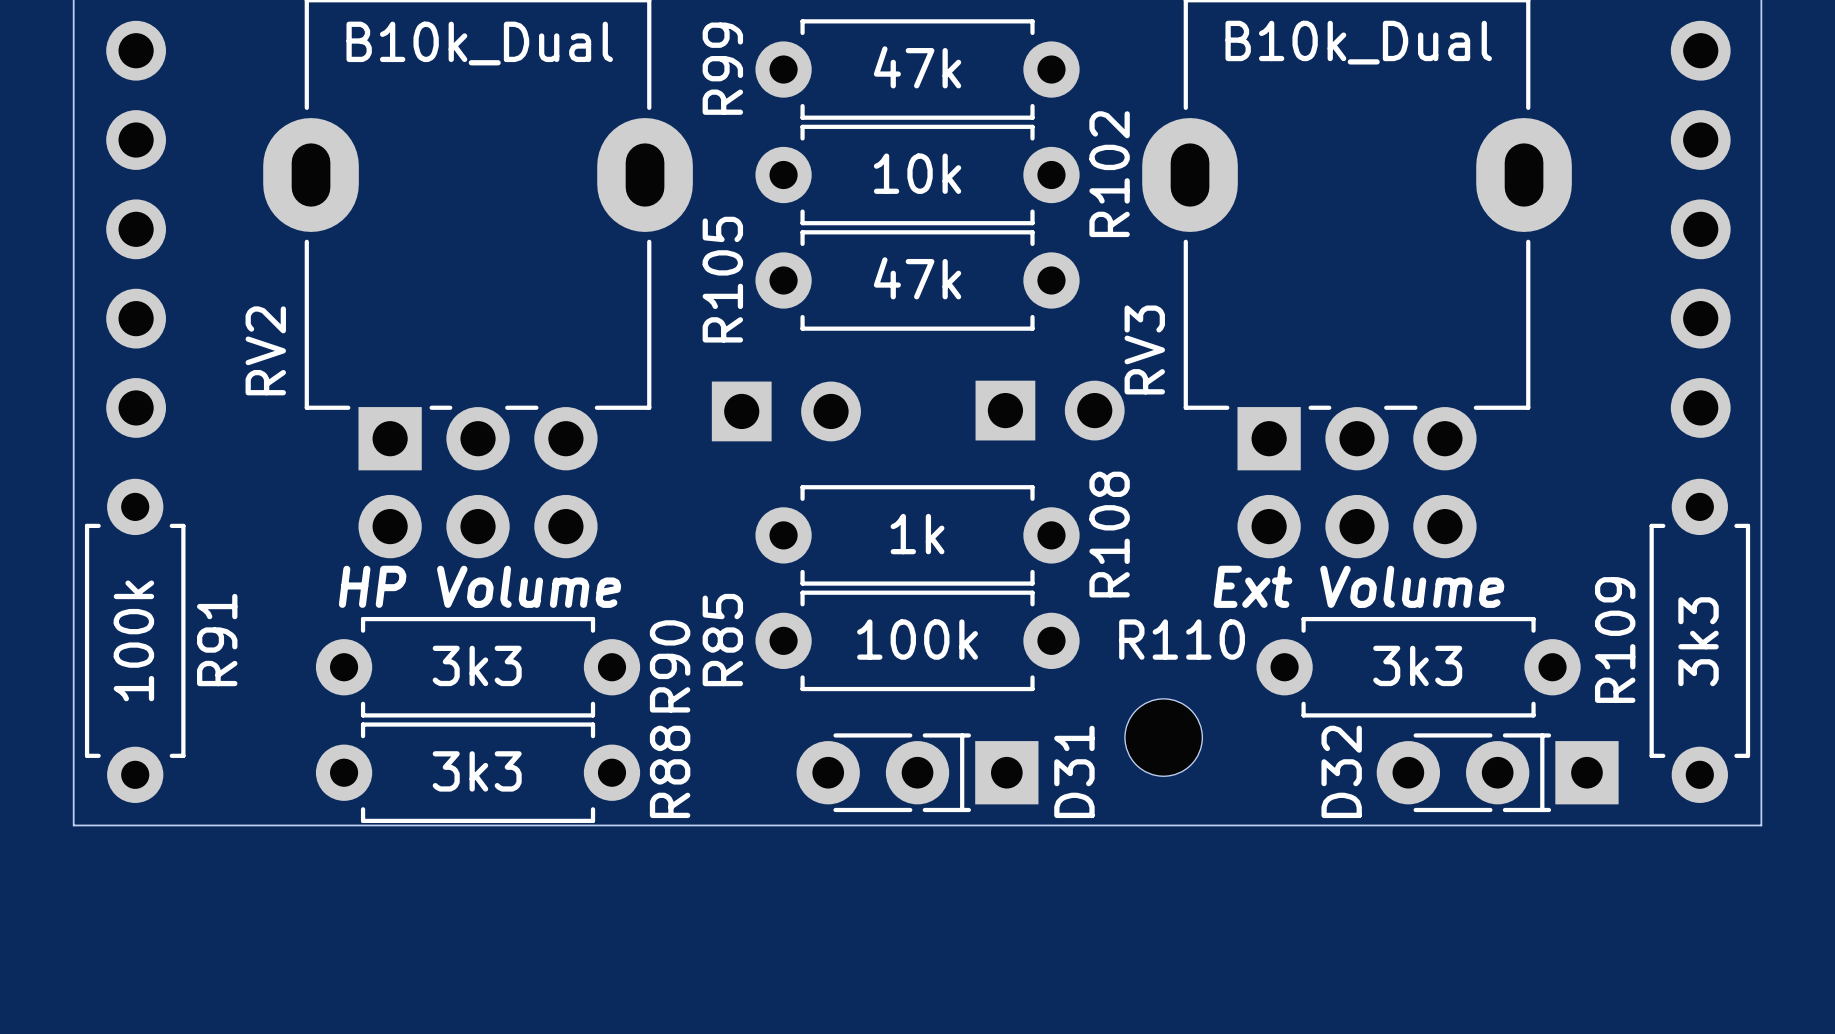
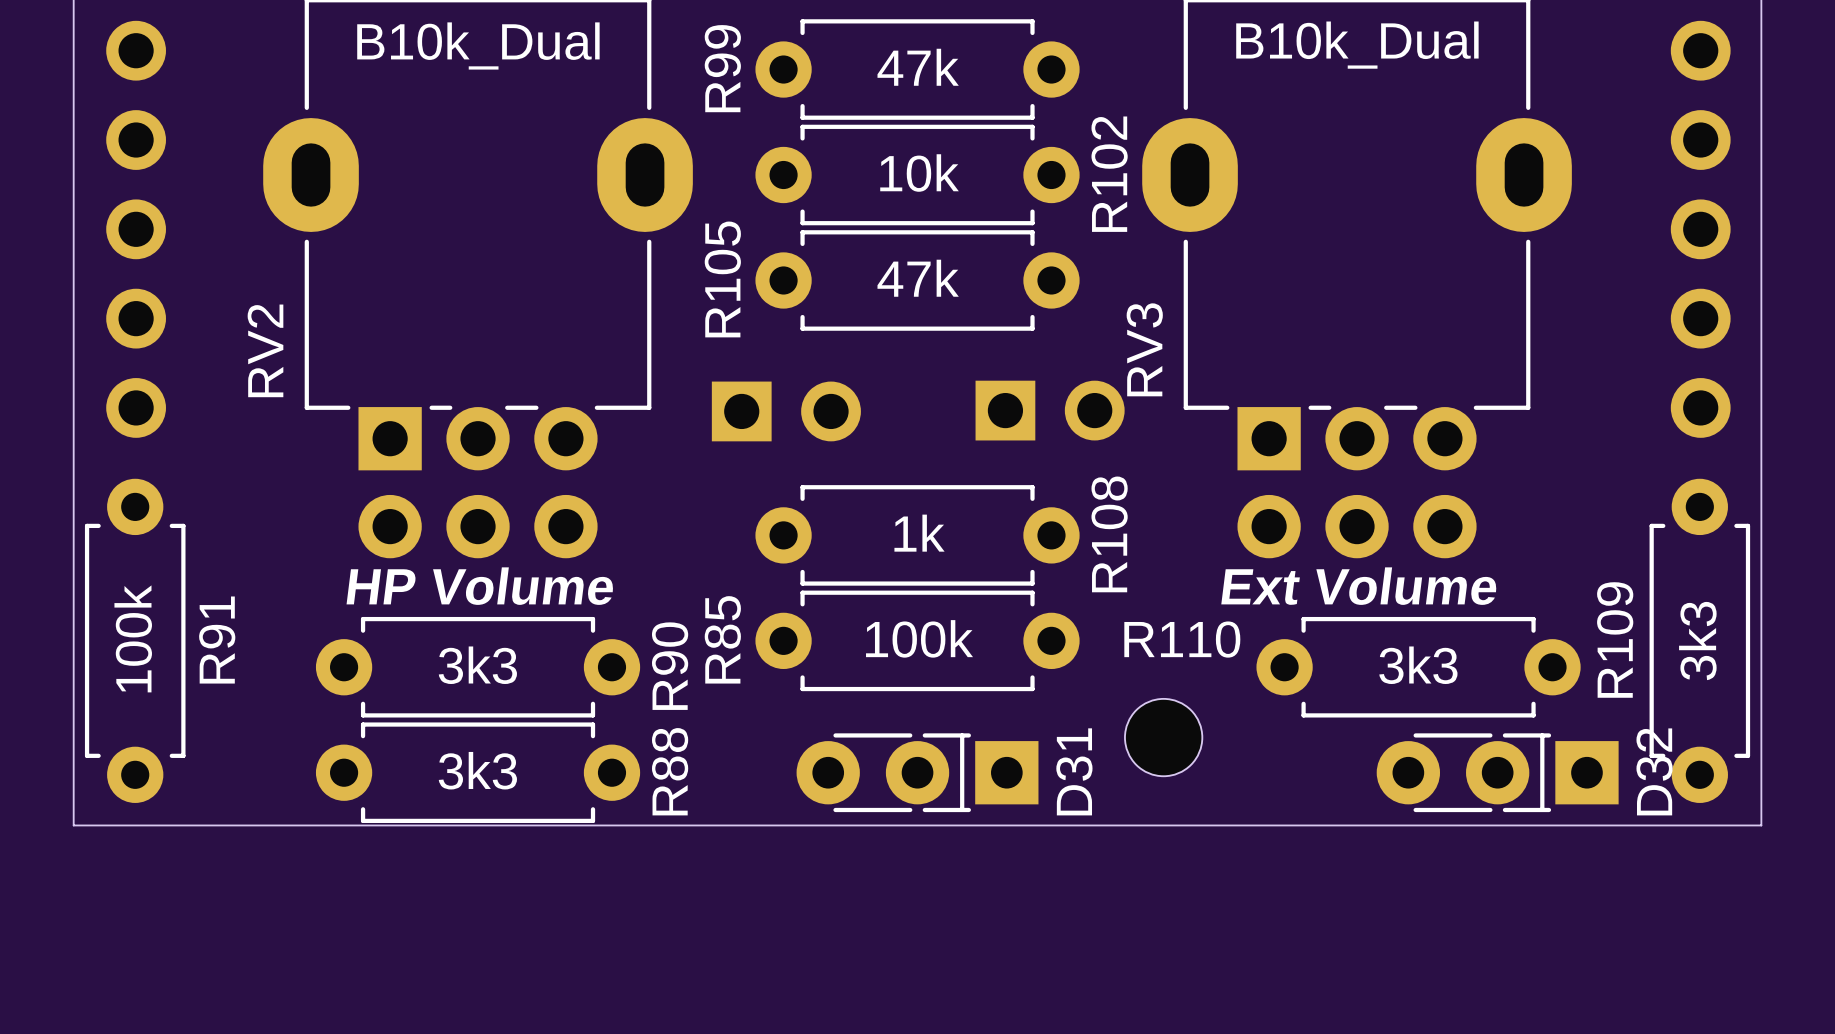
D32 name position: D32 (1341, 771) -> D32 (1654, 771)

